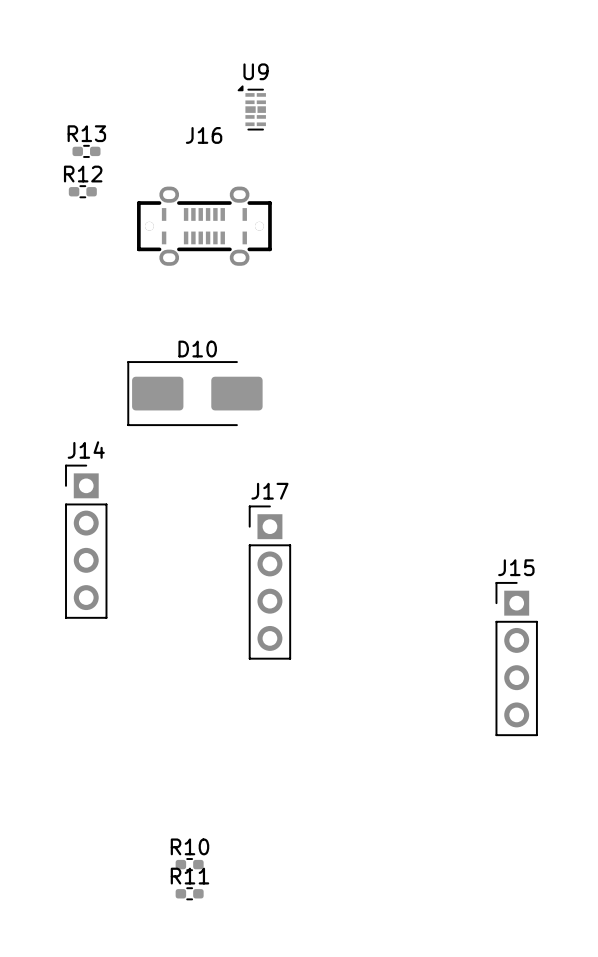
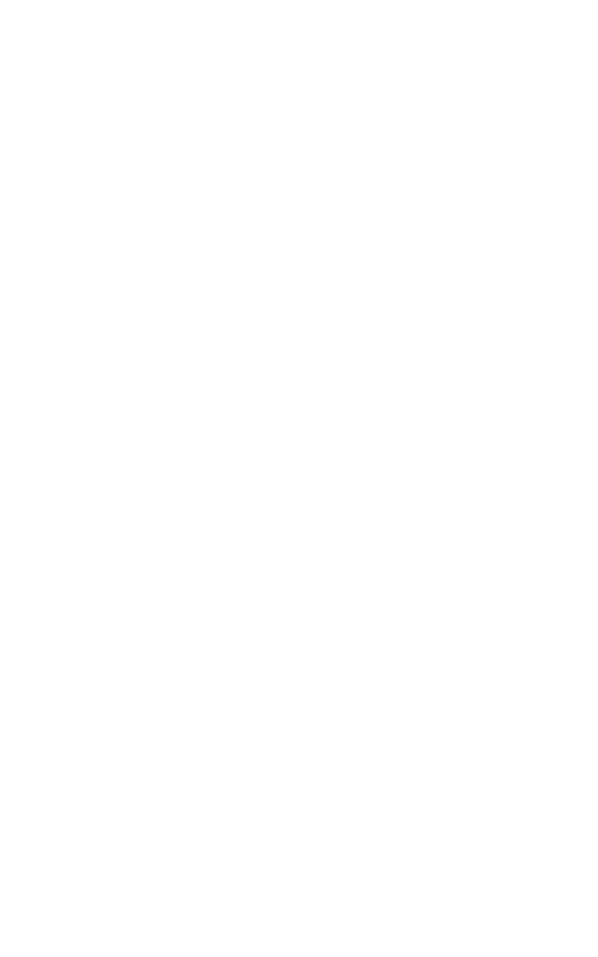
U9: (251, 107) -> none
R13: (86, 151) -> none
R12: (82, 191) -> none
J16: (204, 226) -> none
D10: (194, 393) -> none
J14: (86, 541) -> none
J17: (269, 582) -> none
J15: (516, 659) -> none
R10: (189, 864) -> none
R11: (189, 893) -> none

